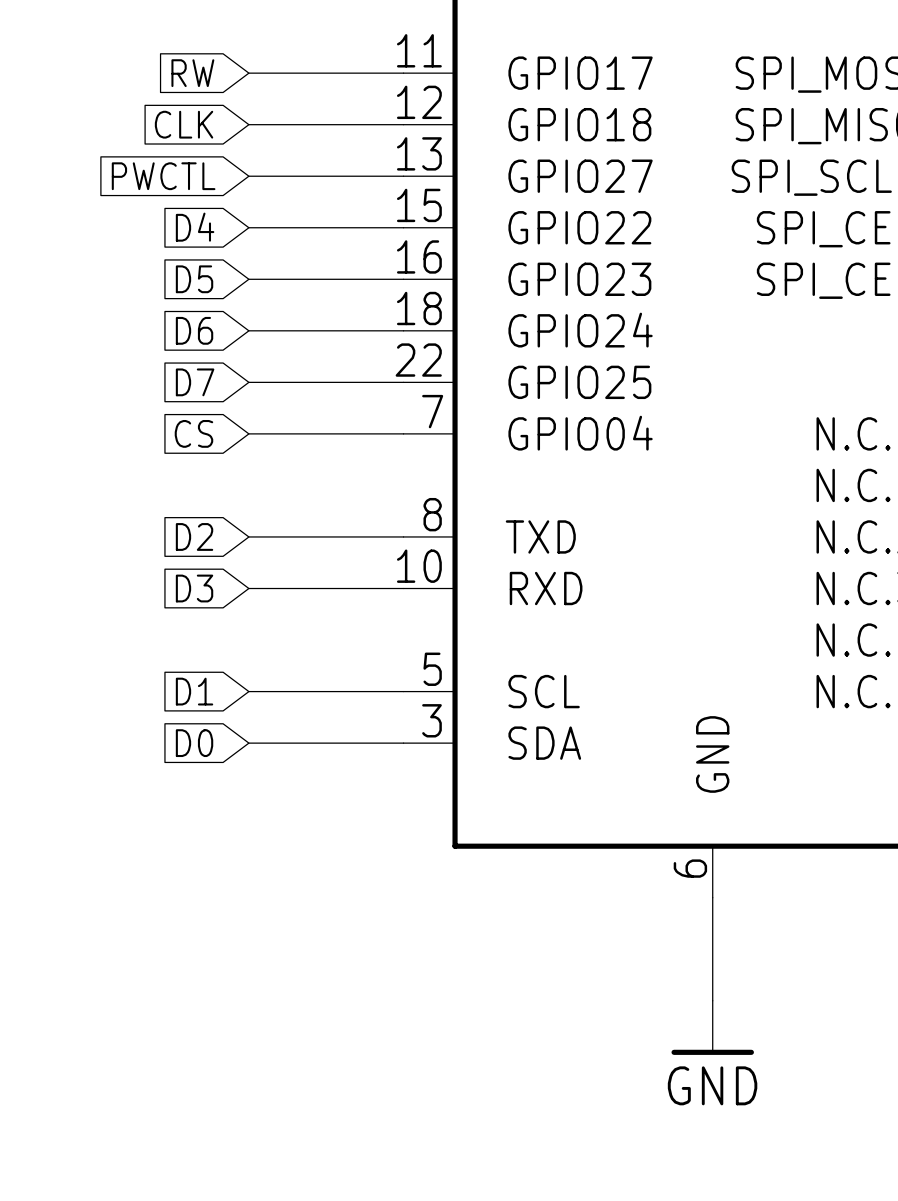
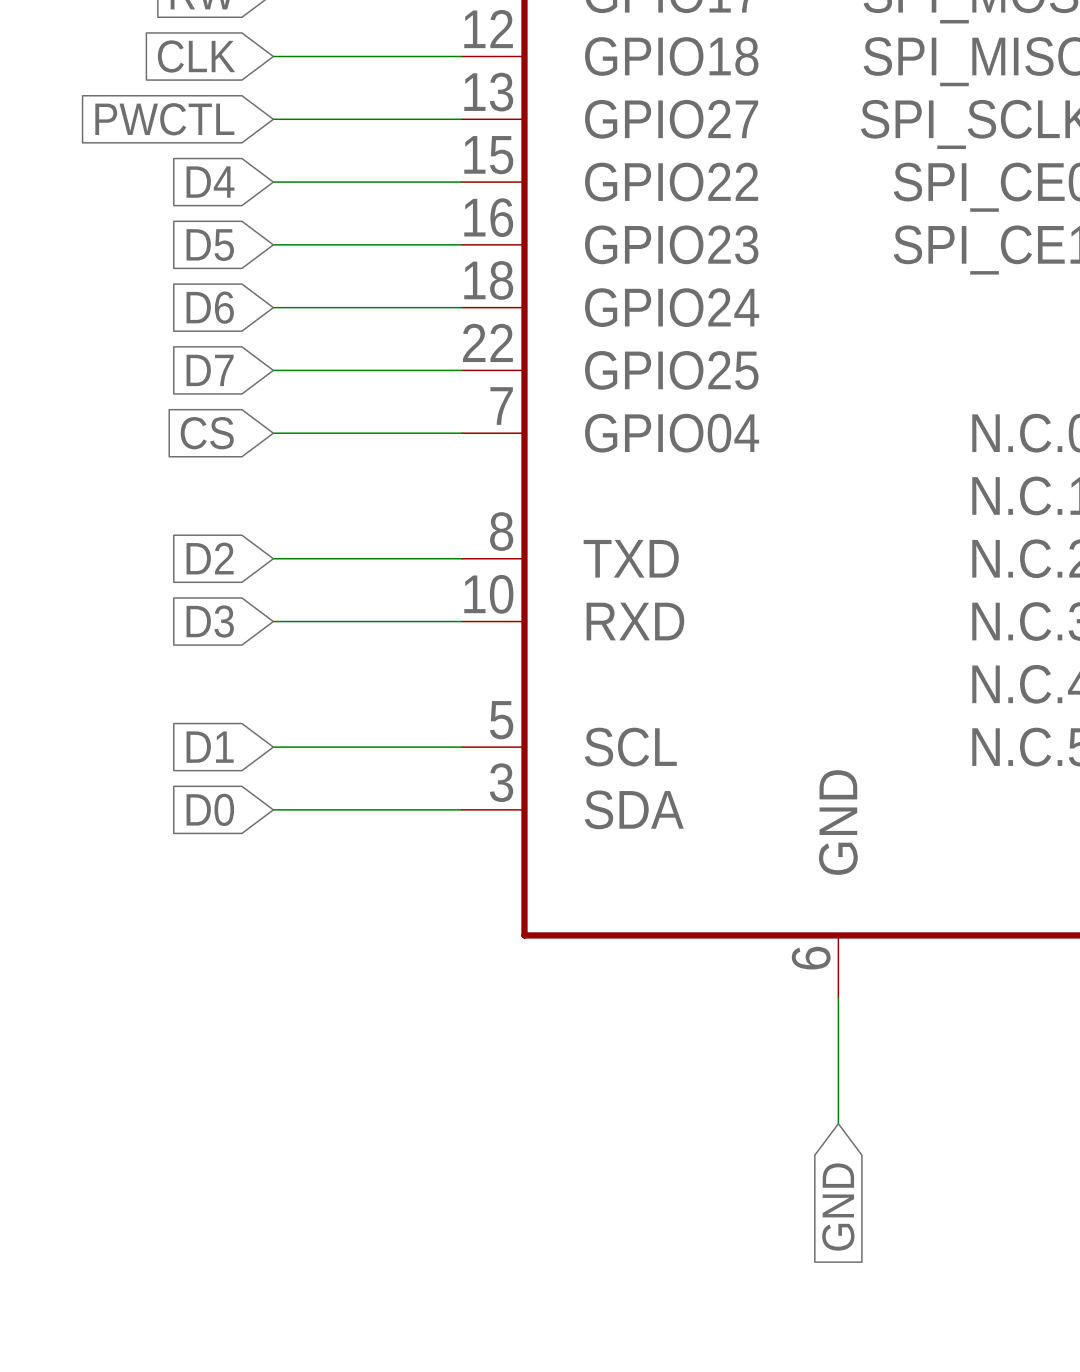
power symbol: GND (712, 1027) -> none
global label: none -> GND (838, 1207)

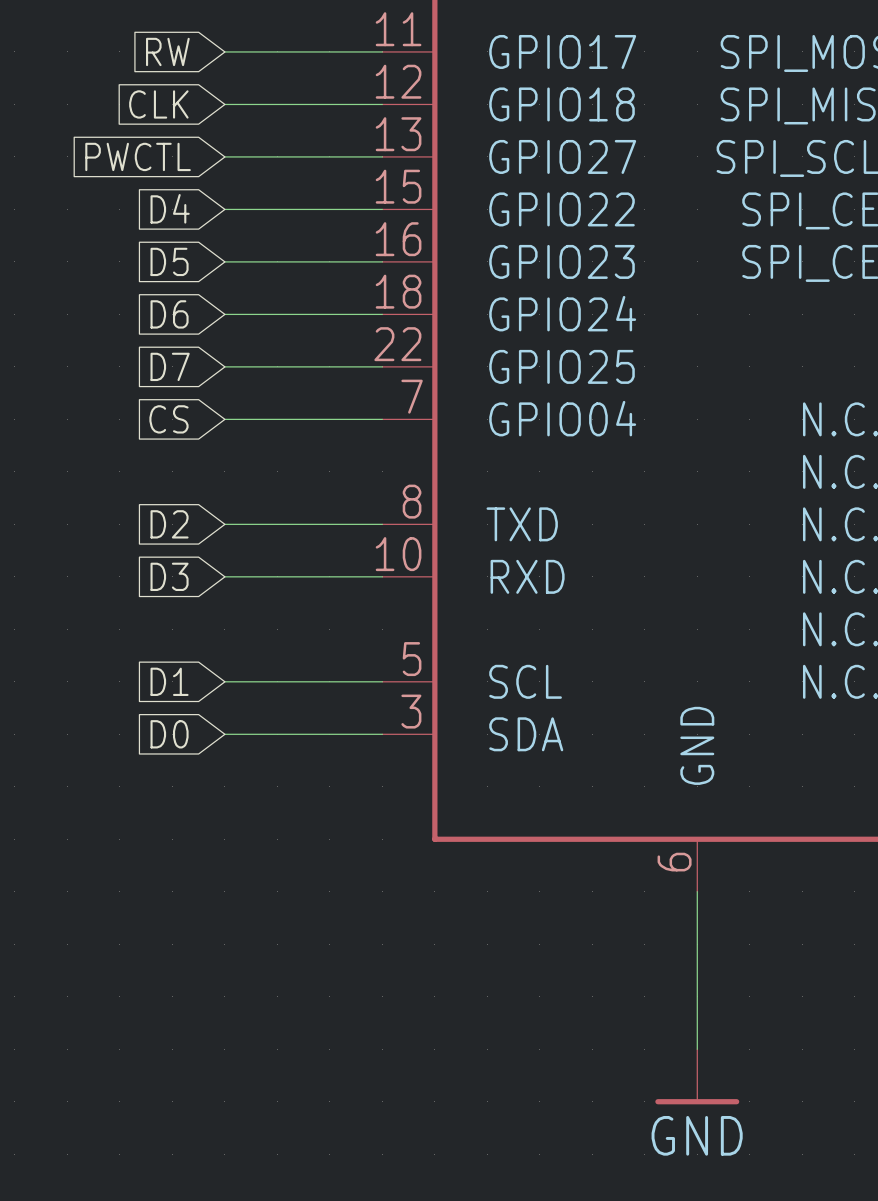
wire: none -> (697, 996) (697, 1049)
global label: GND (838, 1207) -> none
power symbol: none -> GND (697, 1076)

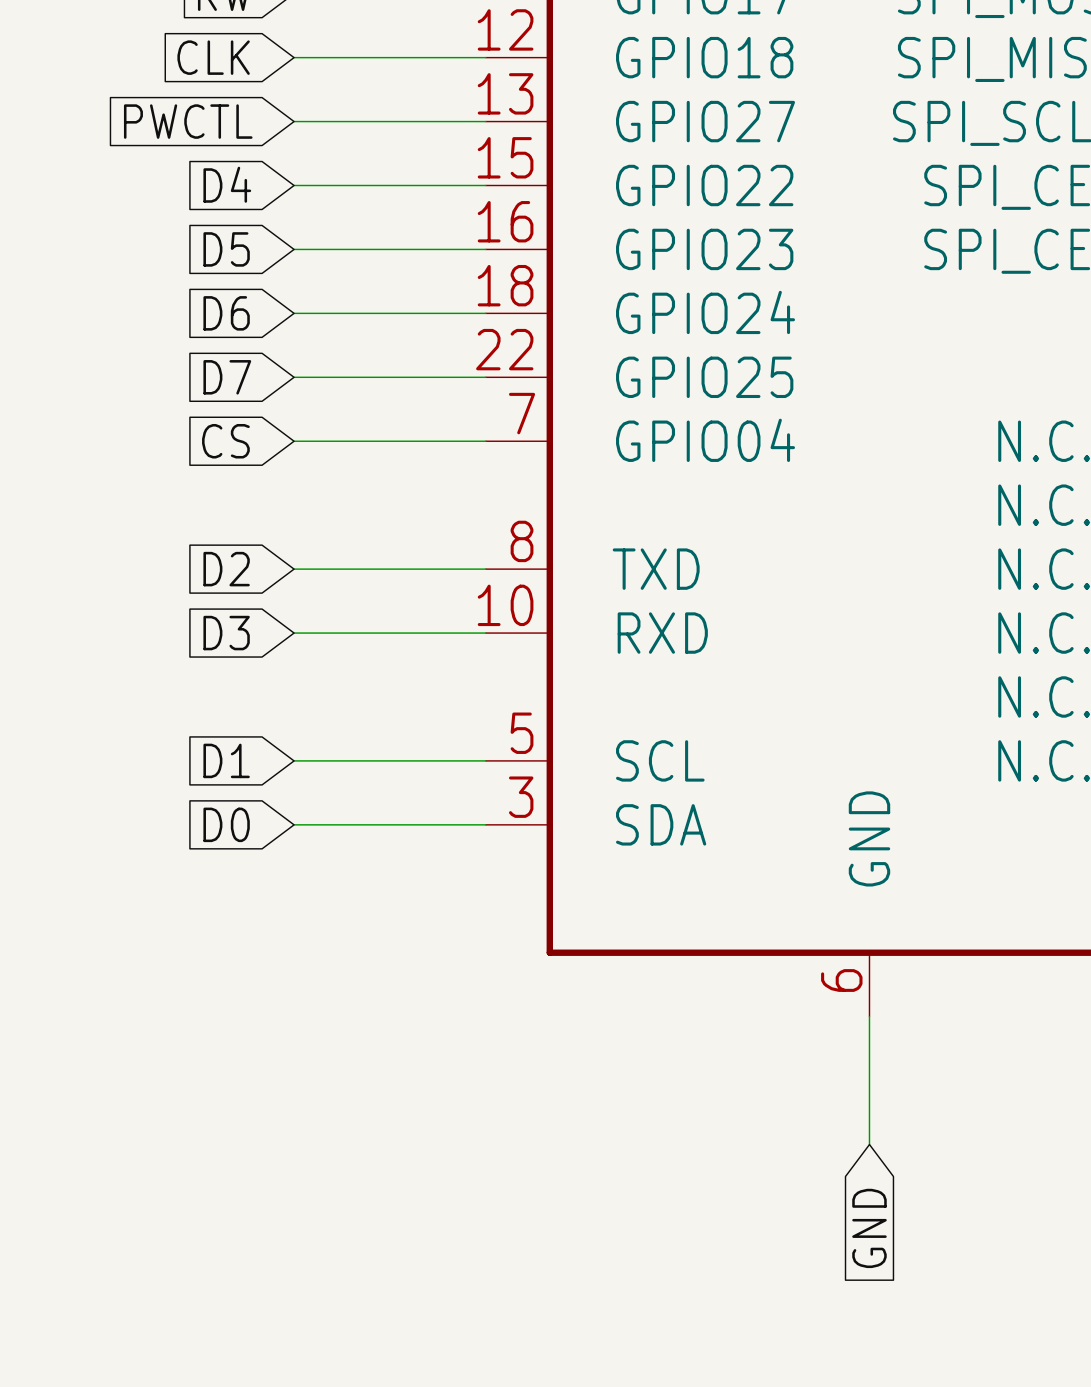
wire: (697, 996) (697, 1049) -> none
global label: none -> GND (869, 1228)
power symbol: GND (697, 1076) -> none

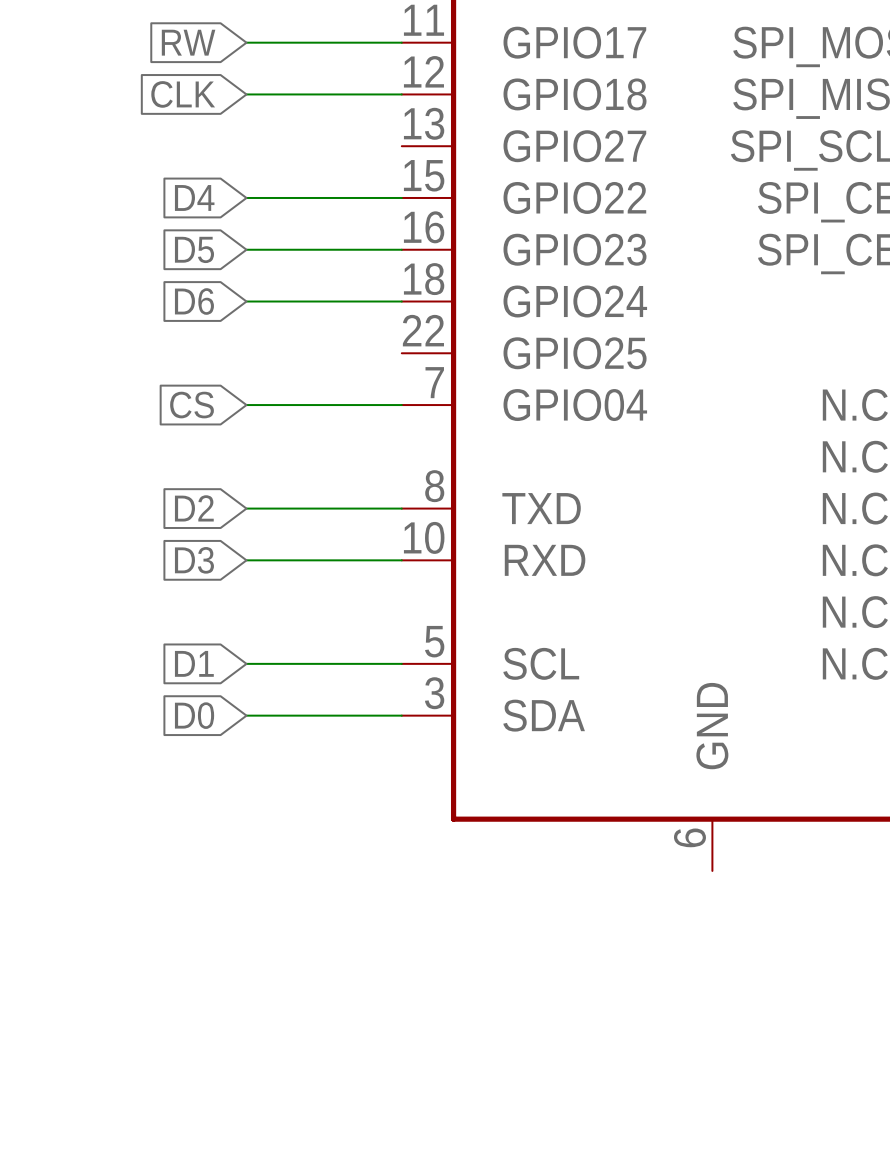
global label: PWCTL (188, 121) -> none
wire: (294, 121) (485, 121) -> none
global label: D7 (227, 377) -> none
wire: (294, 377) (485, 377) -> none
wire: (869, 1016) (869, 1144) -> none
global label: GND (869, 1228) -> none

